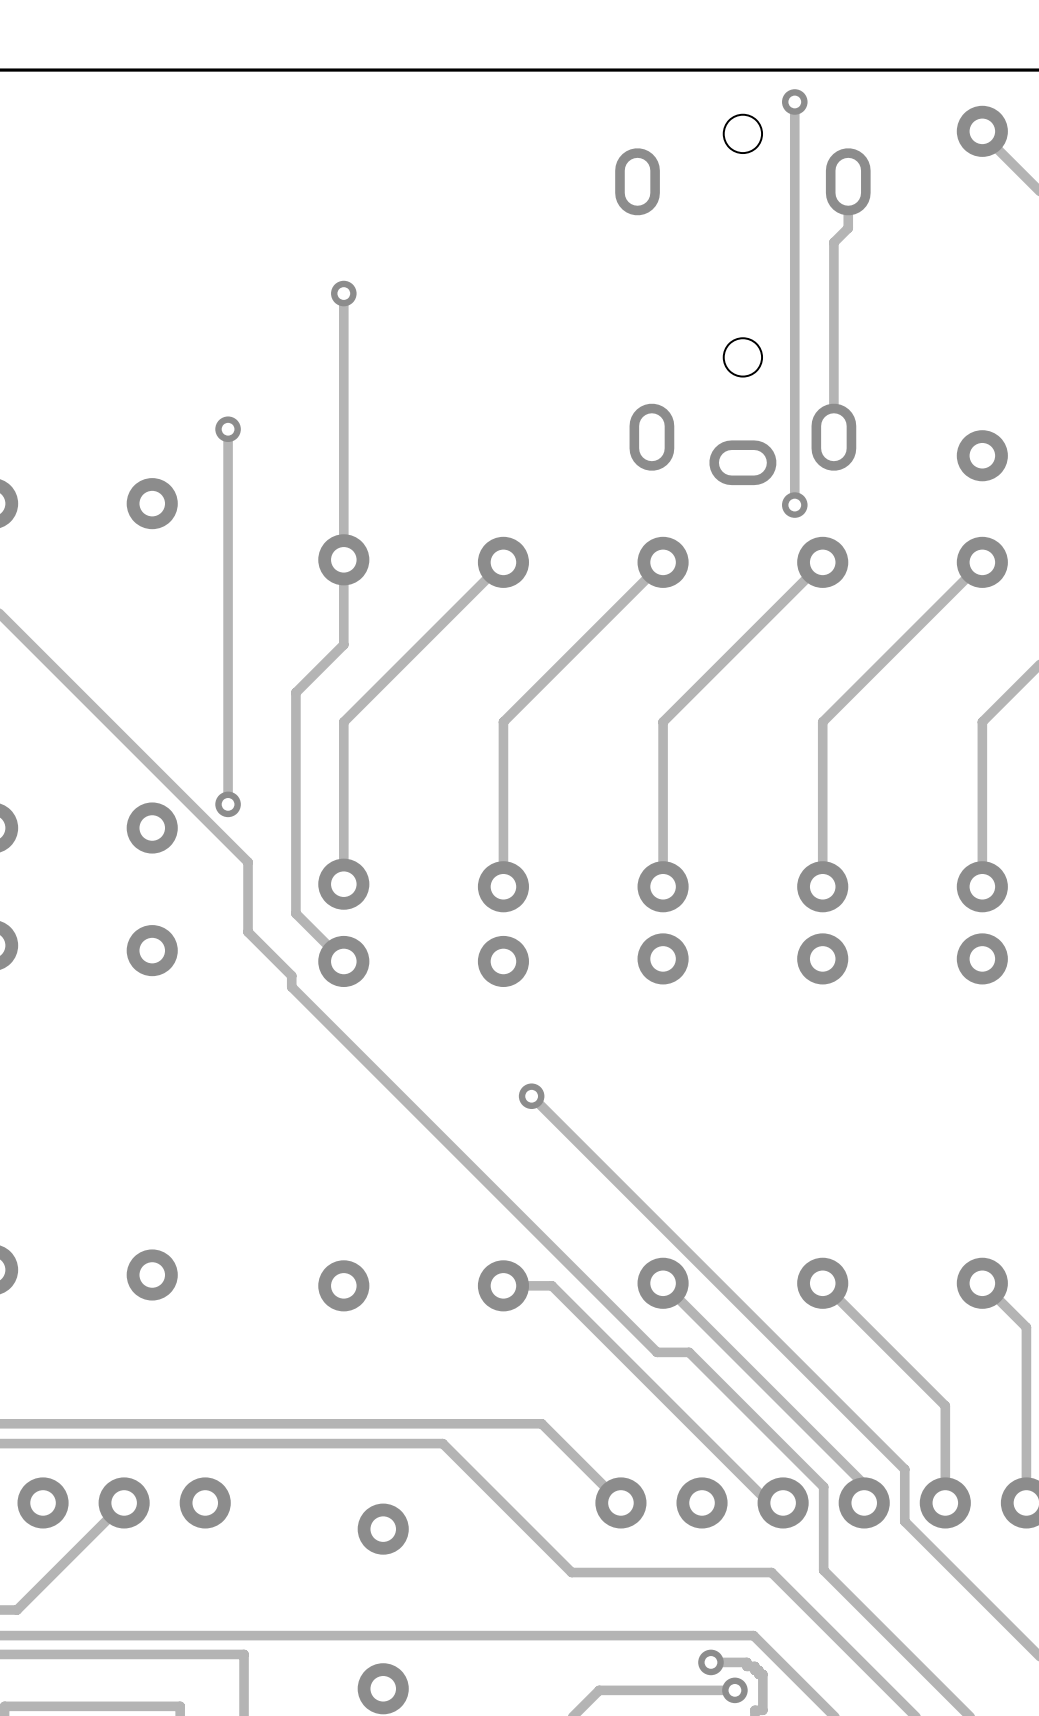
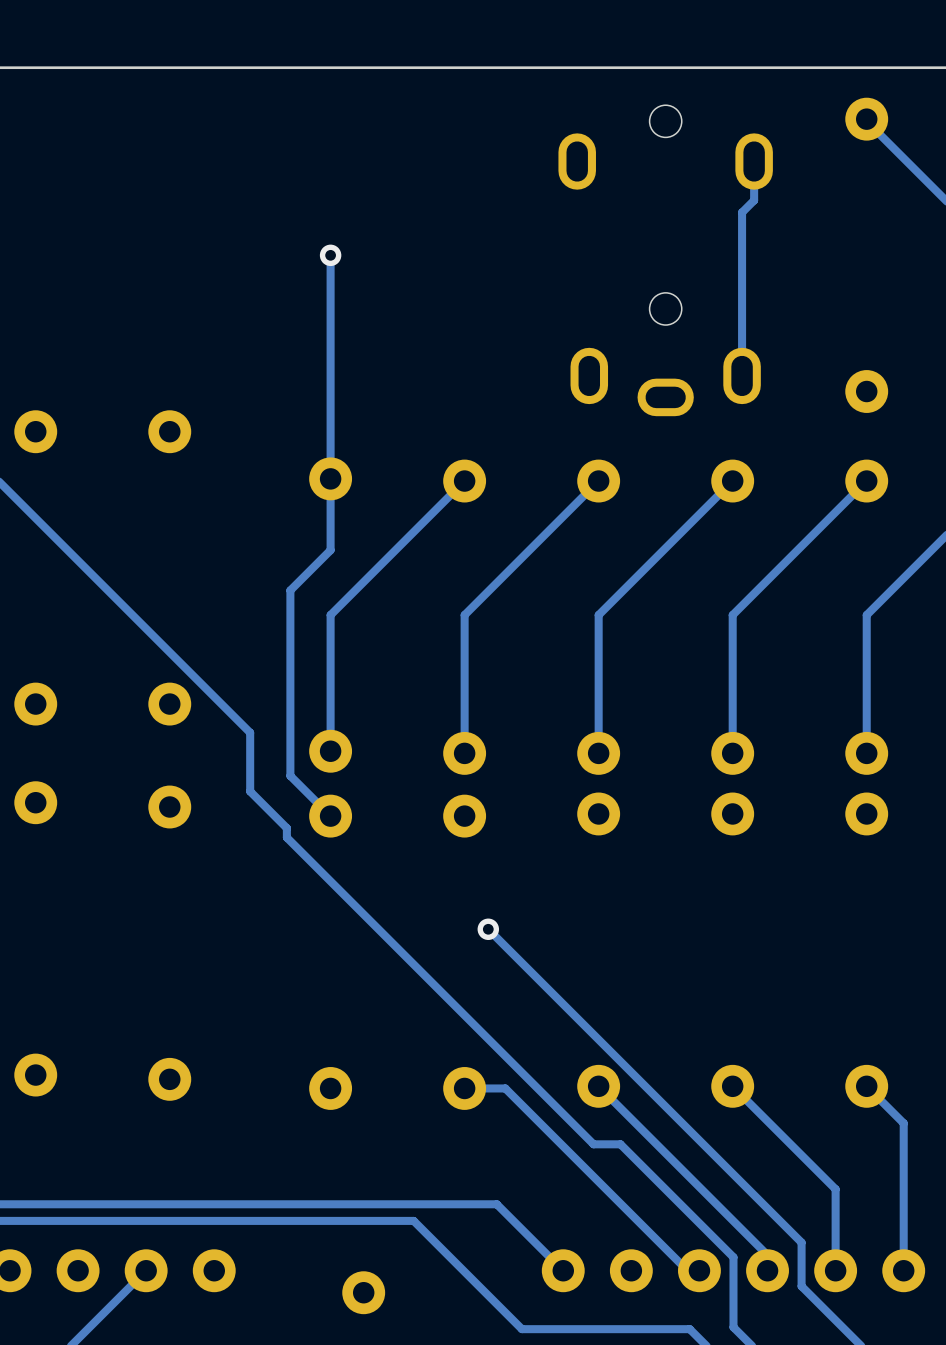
track: (794, 101) (794, 505) -> none
via: (794, 101) -> none
track: (228, 429) (228, 804) -> none
via: (228, 429) -> none
via: (794, 505) -> none
via: (228, 804) -> none

